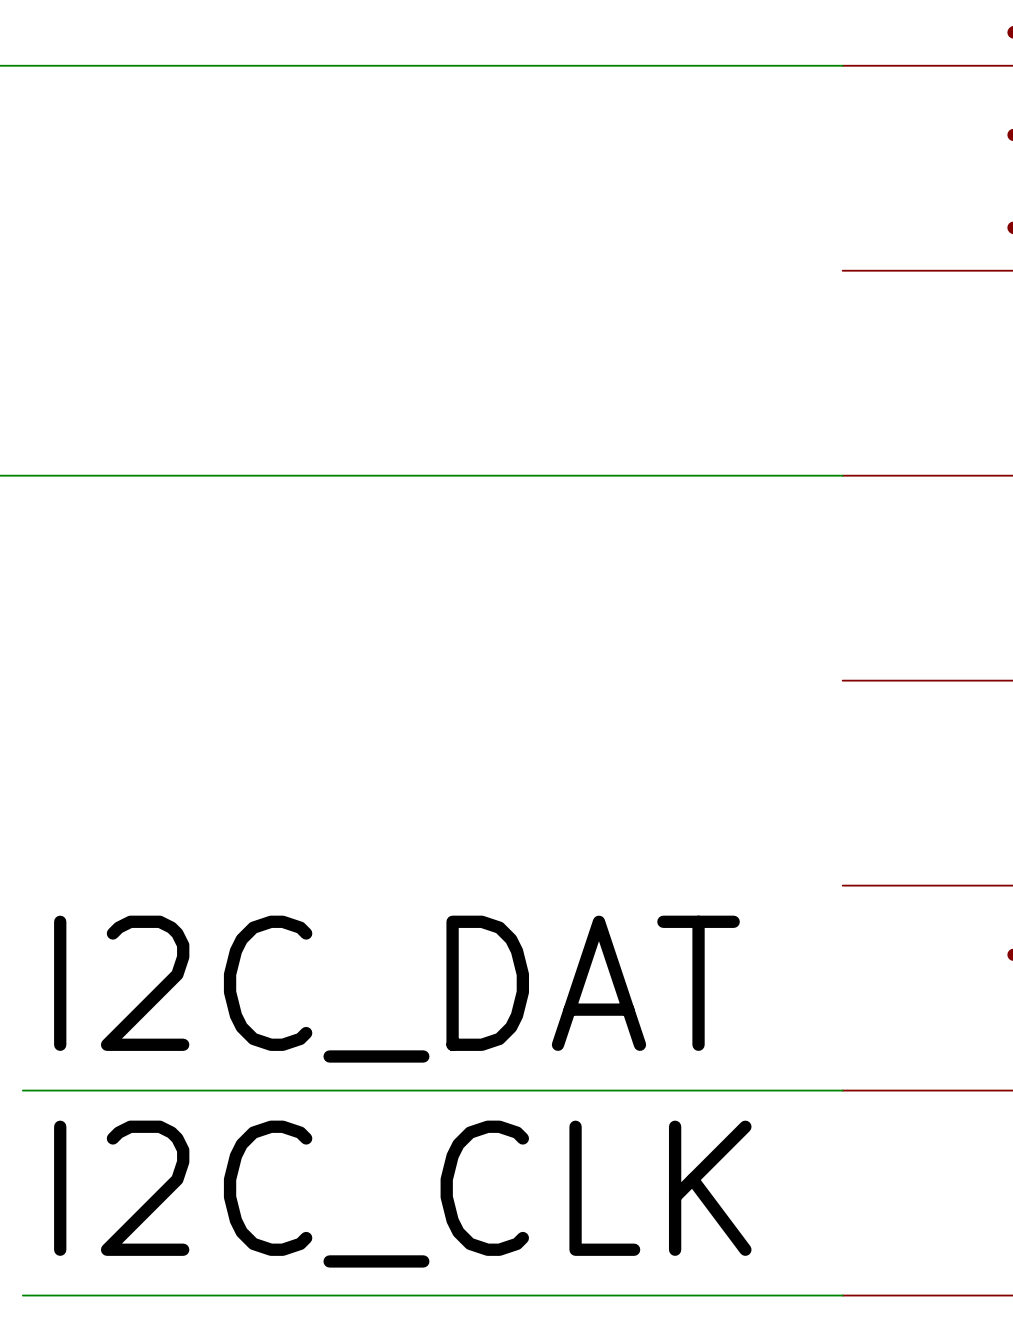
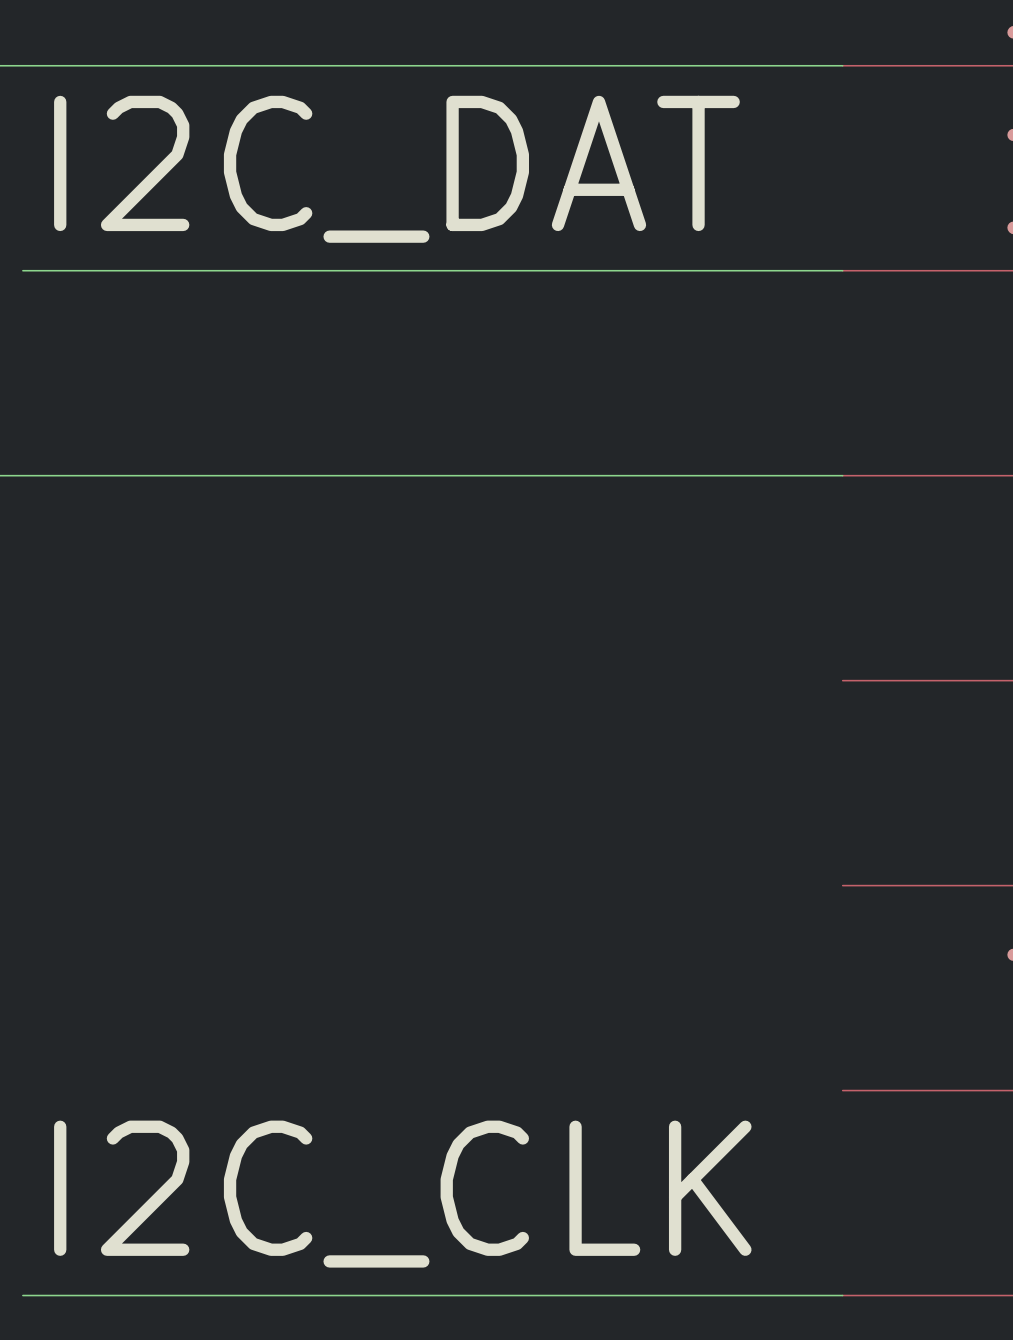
label position: I2C_DAT (396, 989) -> I2C_DAT (396, 169)
wire: (22, 1090) (842, 1090) -> (22, 270) (842, 270)

